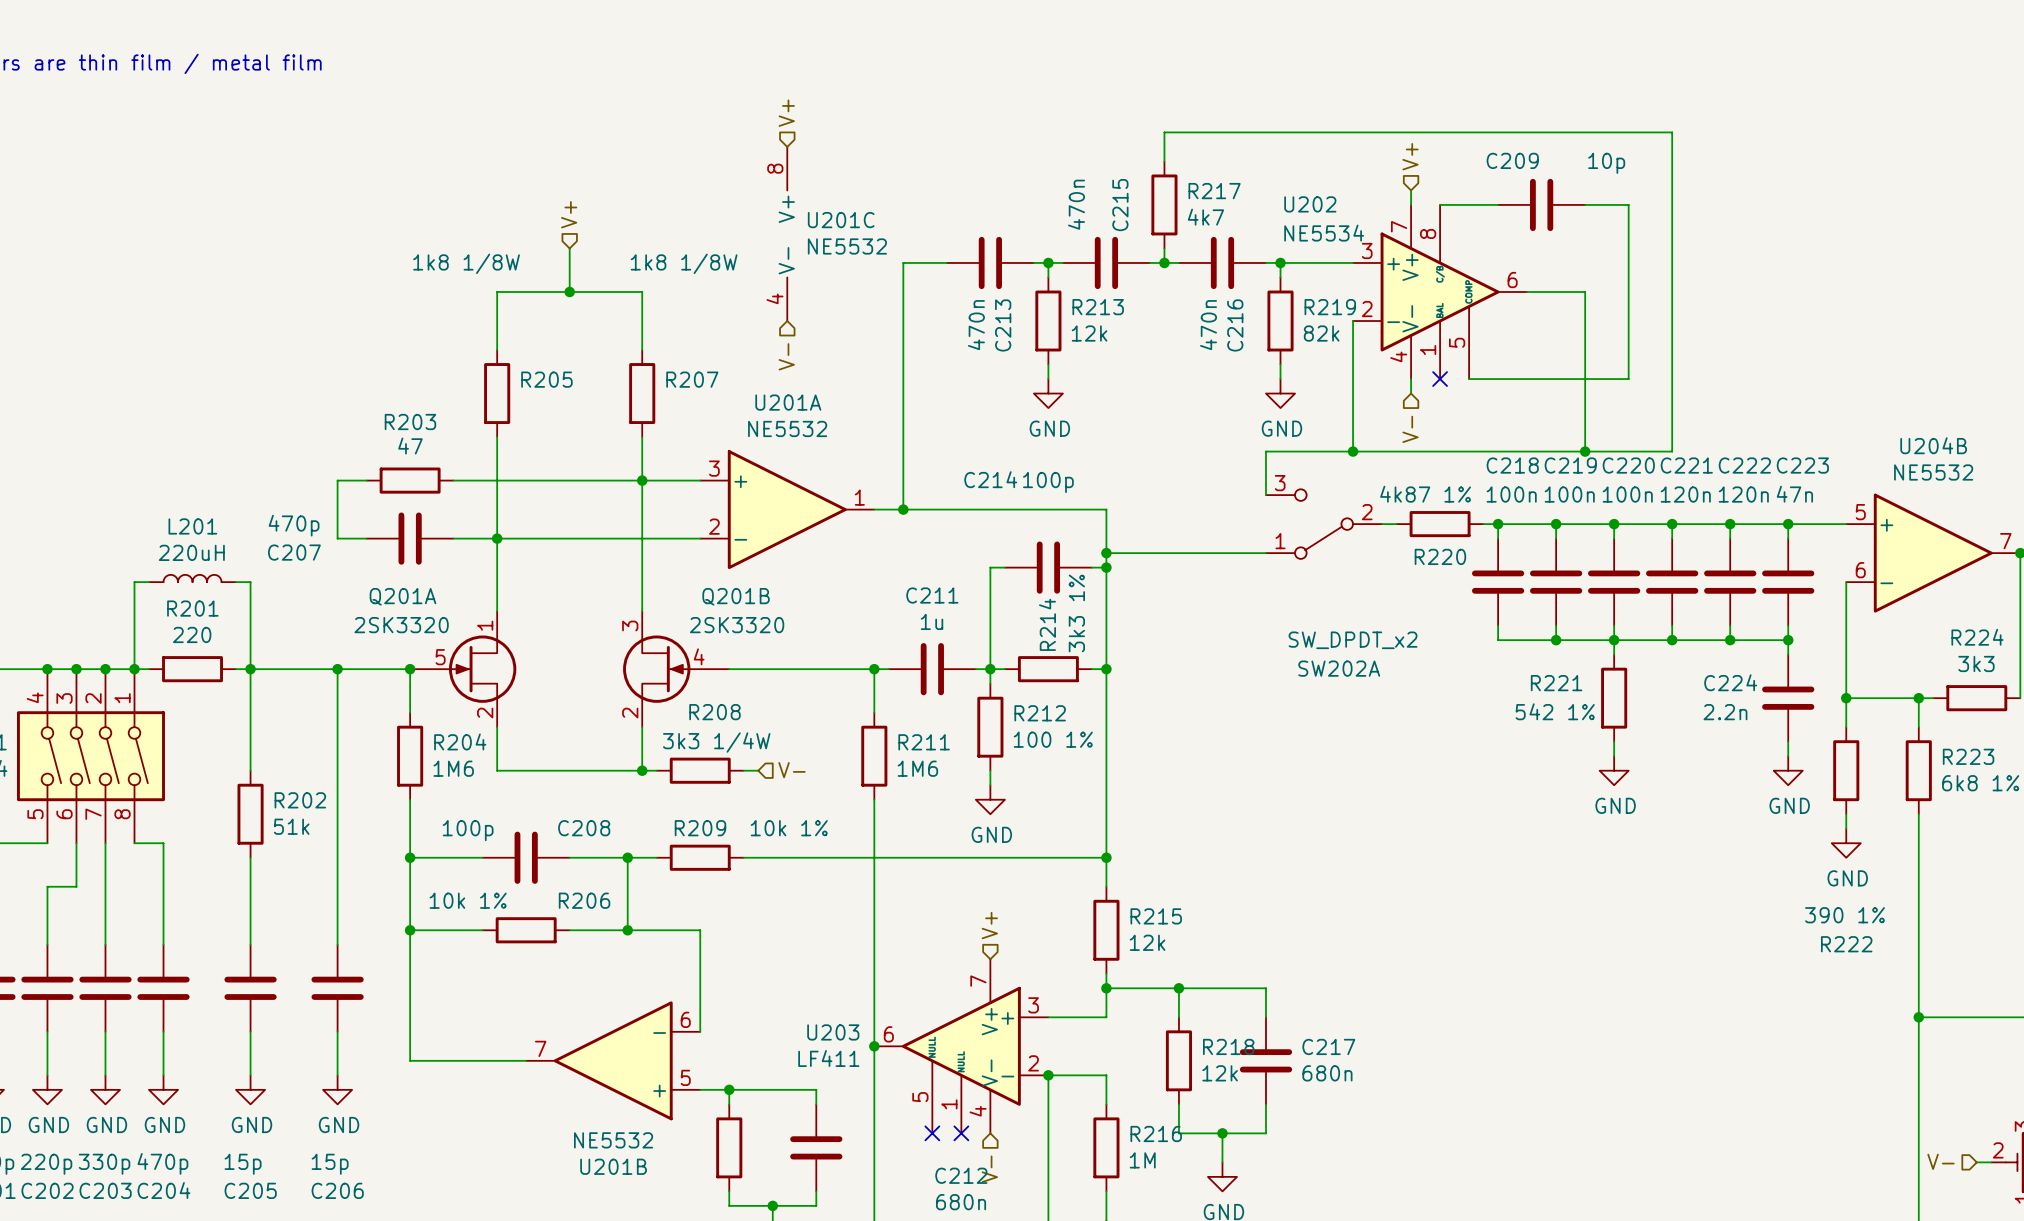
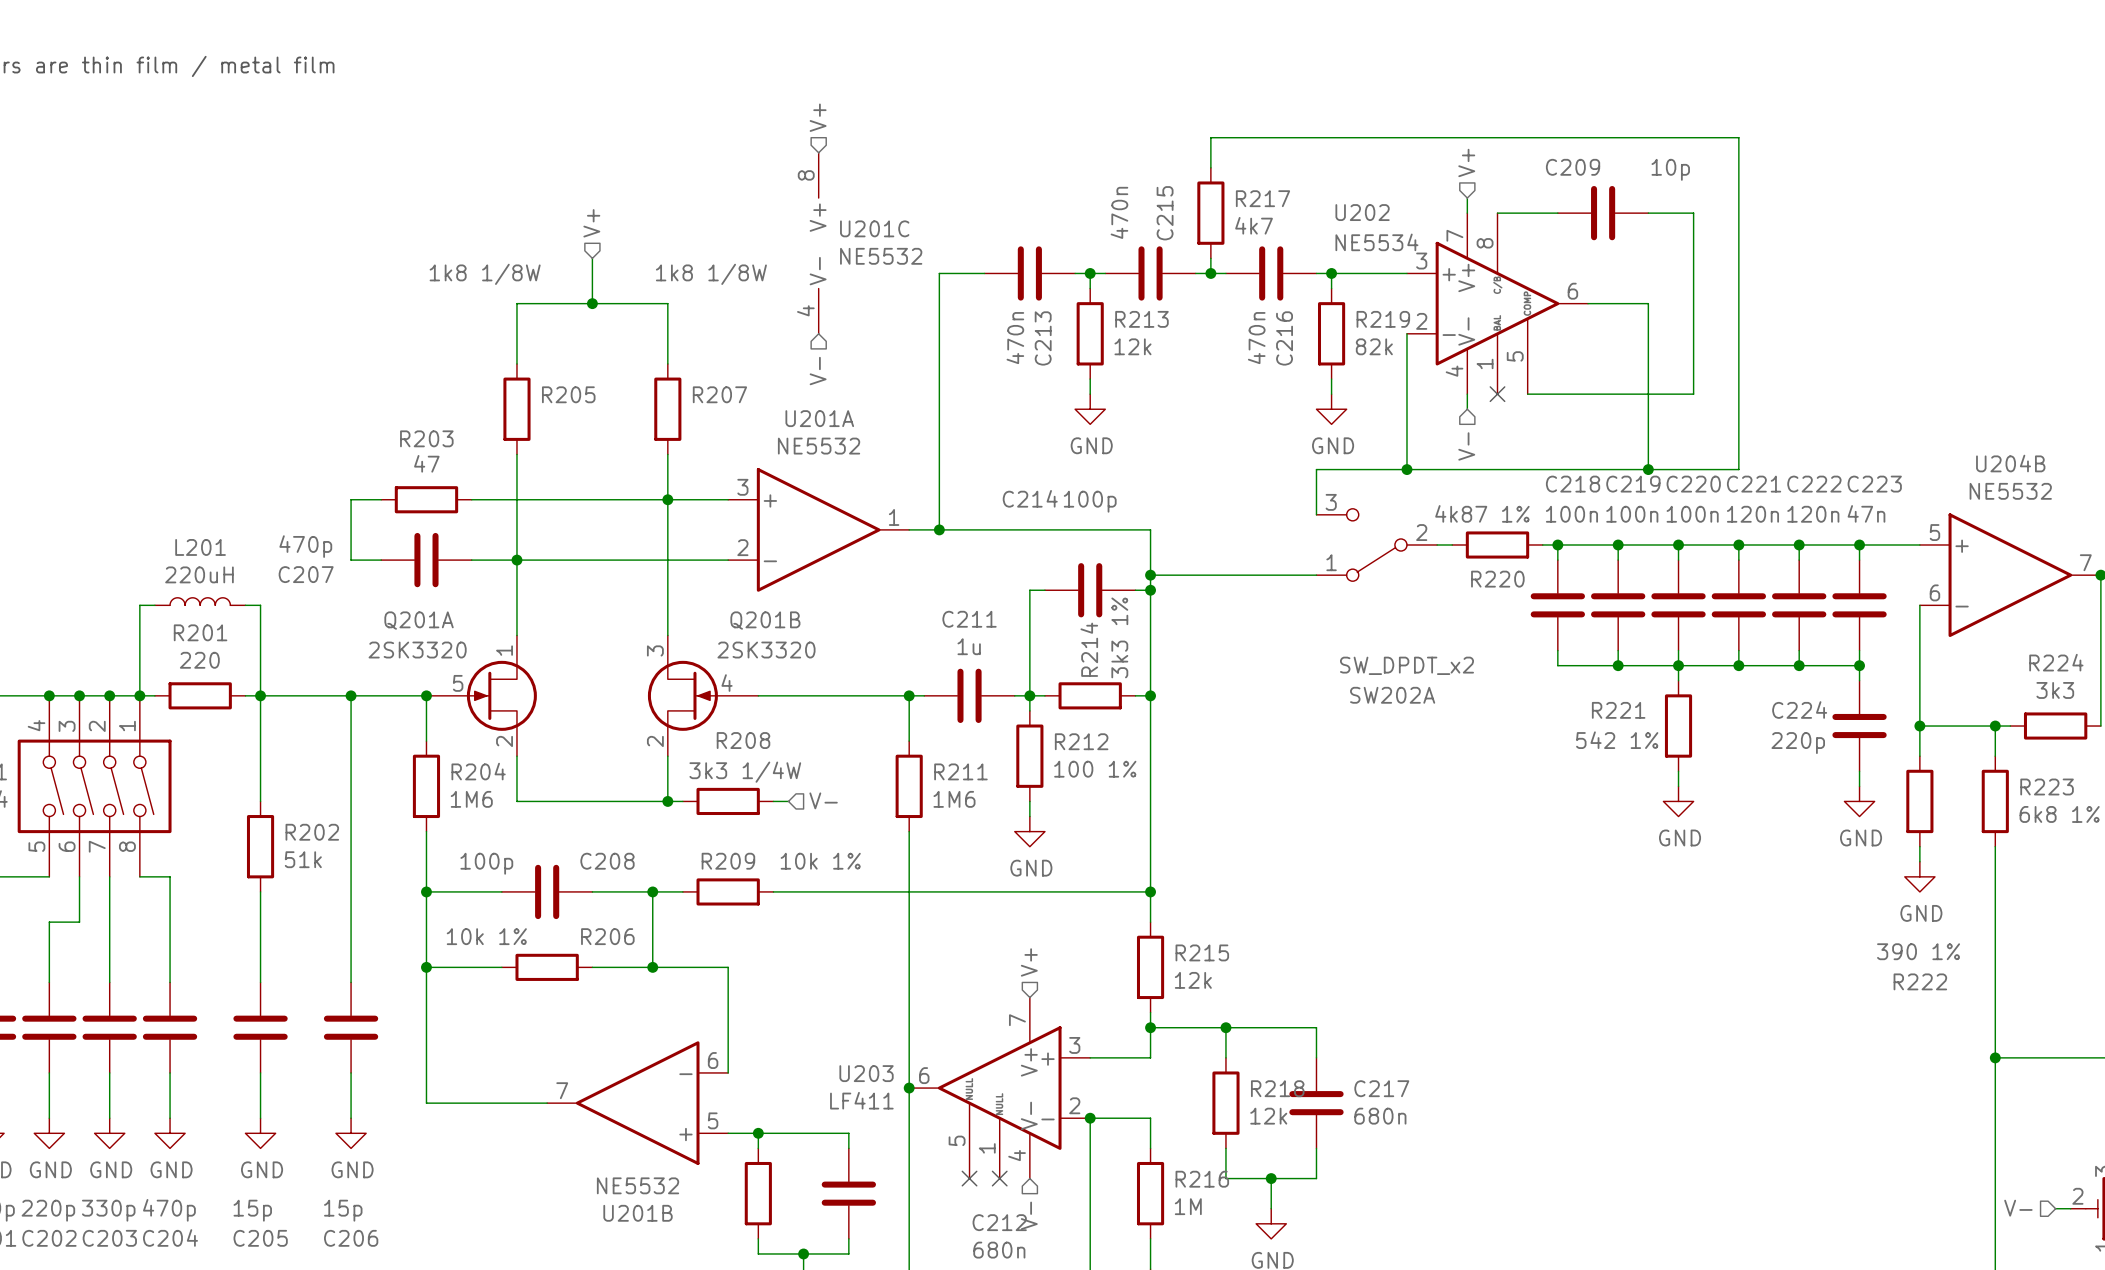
C224 value: 2.2n (1725, 712) -> 220p (1798, 743)

